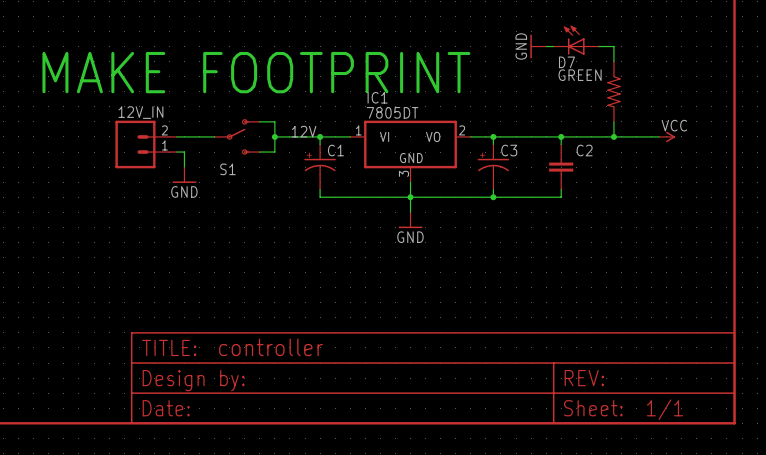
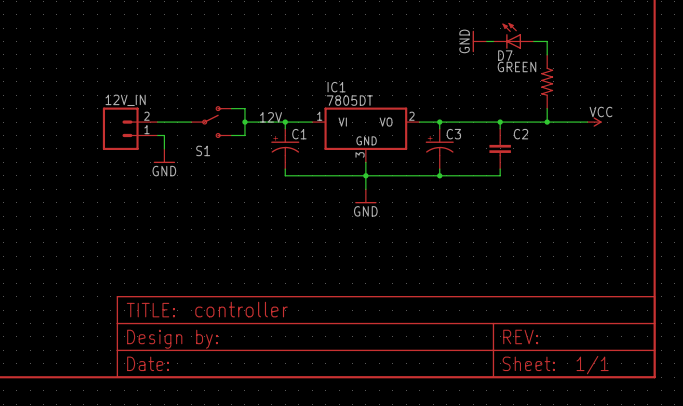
text: MAKE FOOTPRINT (256, 72) -> none

